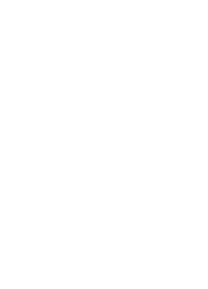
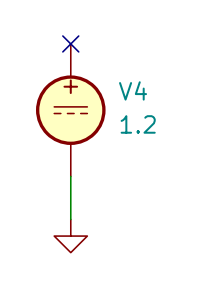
no-connect mark: none -> (70, 43)
V4: none -> 1.2 (70, 110)
wire: none -> (70, 176) (70, 219)
power symbol: none -> (70, 236)

